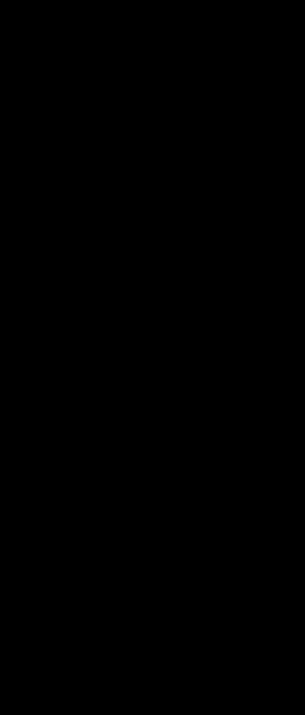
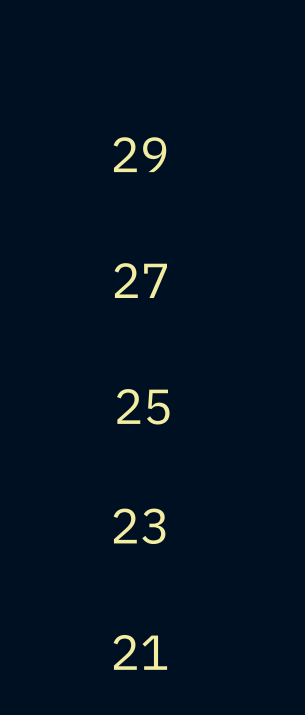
text: none -> 29 (139, 154)
text: none -> 27 (140, 280)
text: none -> 25 (143, 406)
text: none -> 23 (139, 526)
text: none -> 21 (140, 652)

